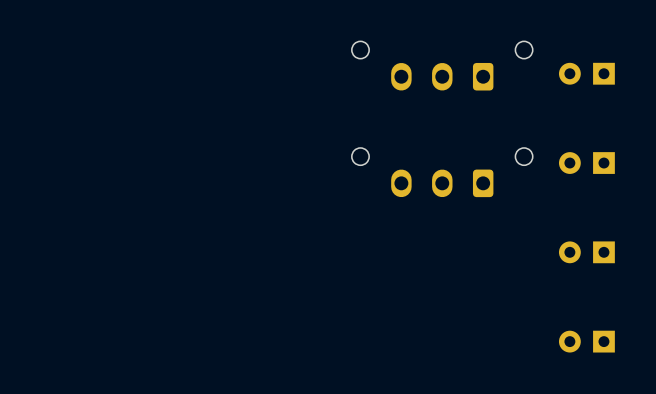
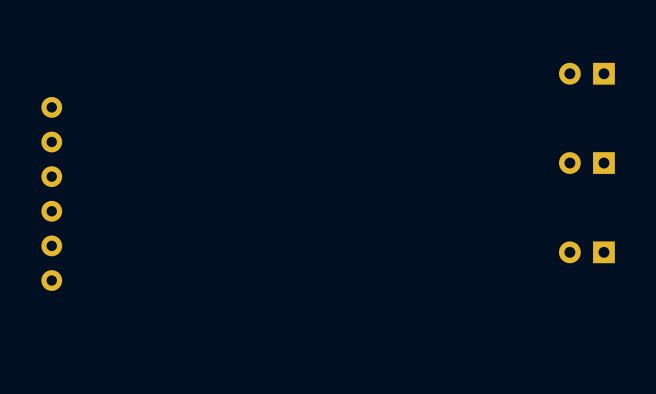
part: (442, 65) -> none
part: (442, 172) -> none
part: none -> (51, 193)
part: (586, 341) -> none

